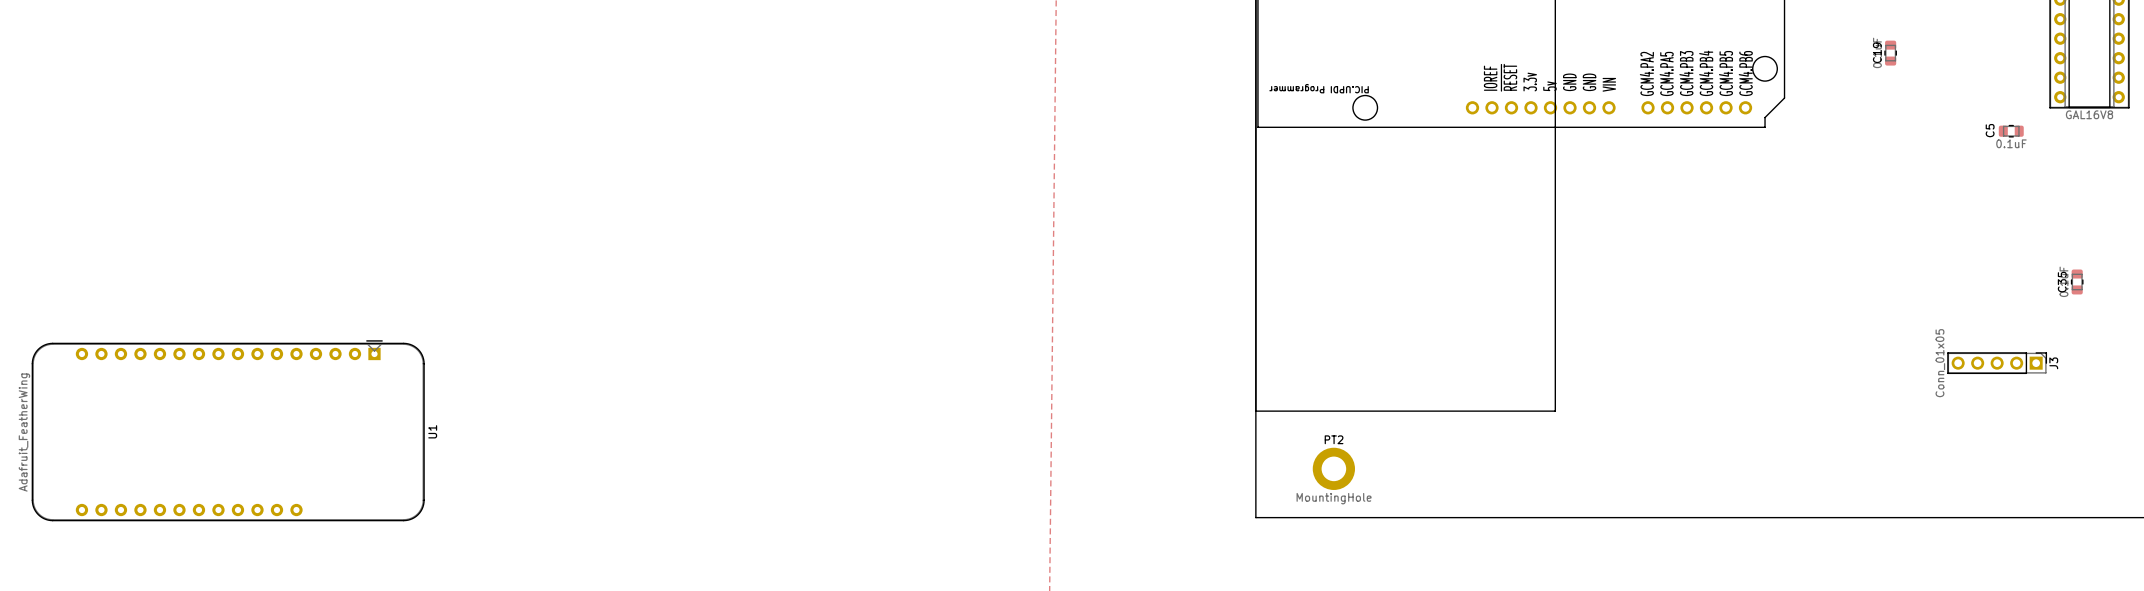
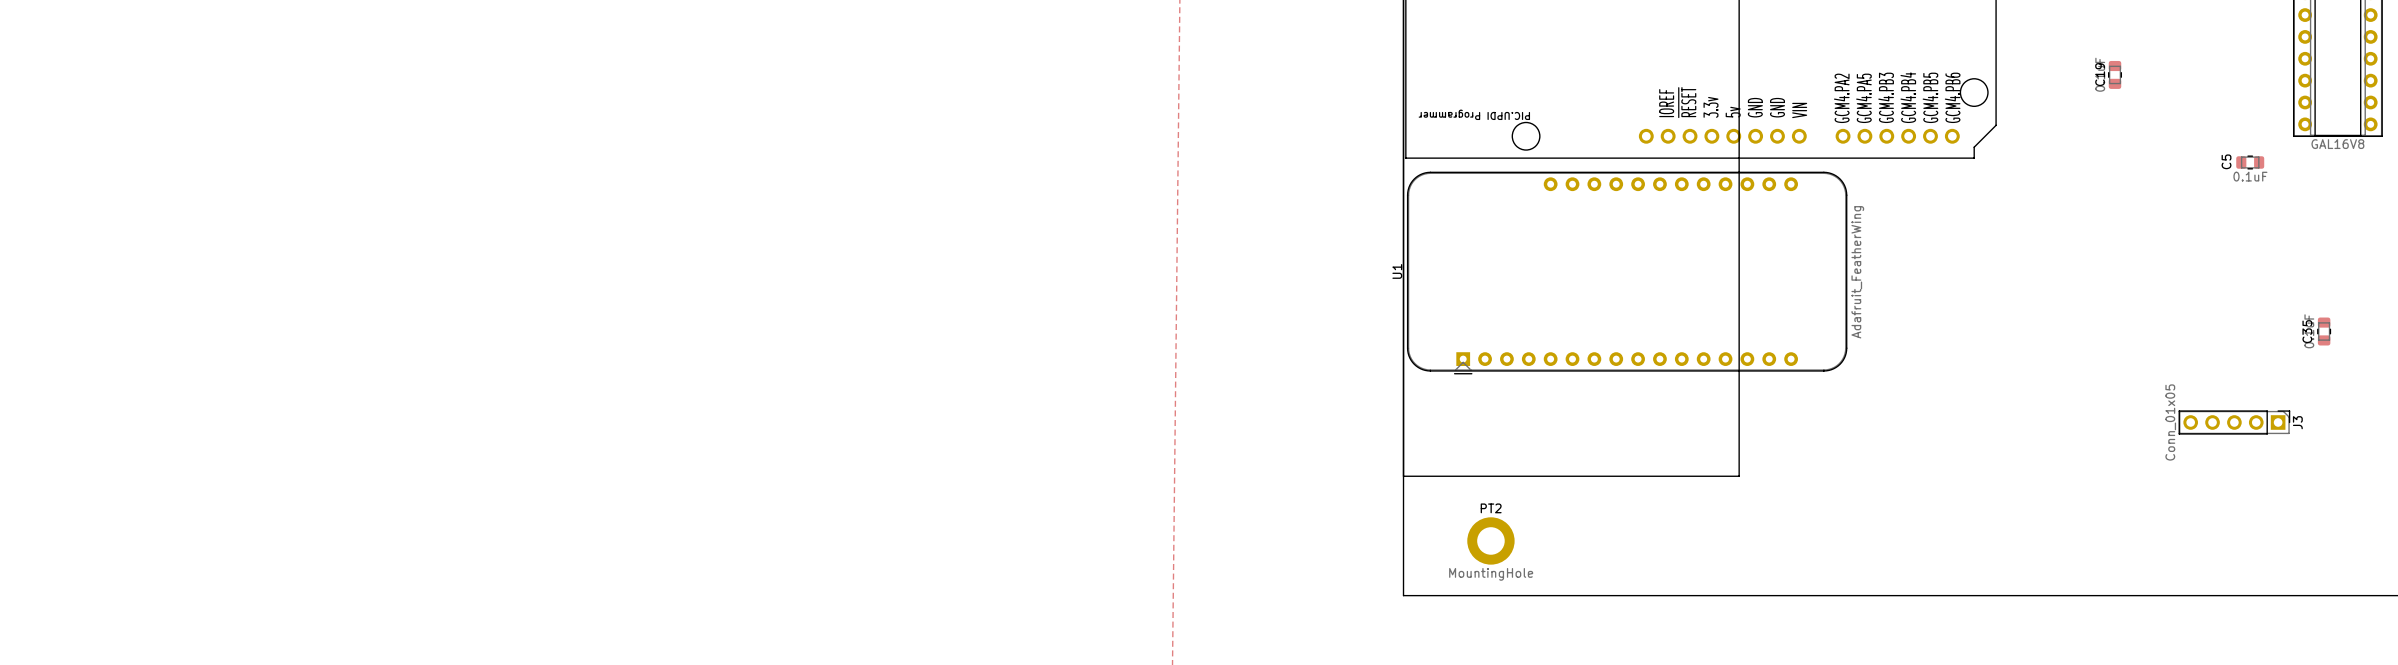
U1 rotation: 0° (228, 430) -> 180° (1627, 273)
U1 position: (228, 430) -> (1627, 273)

